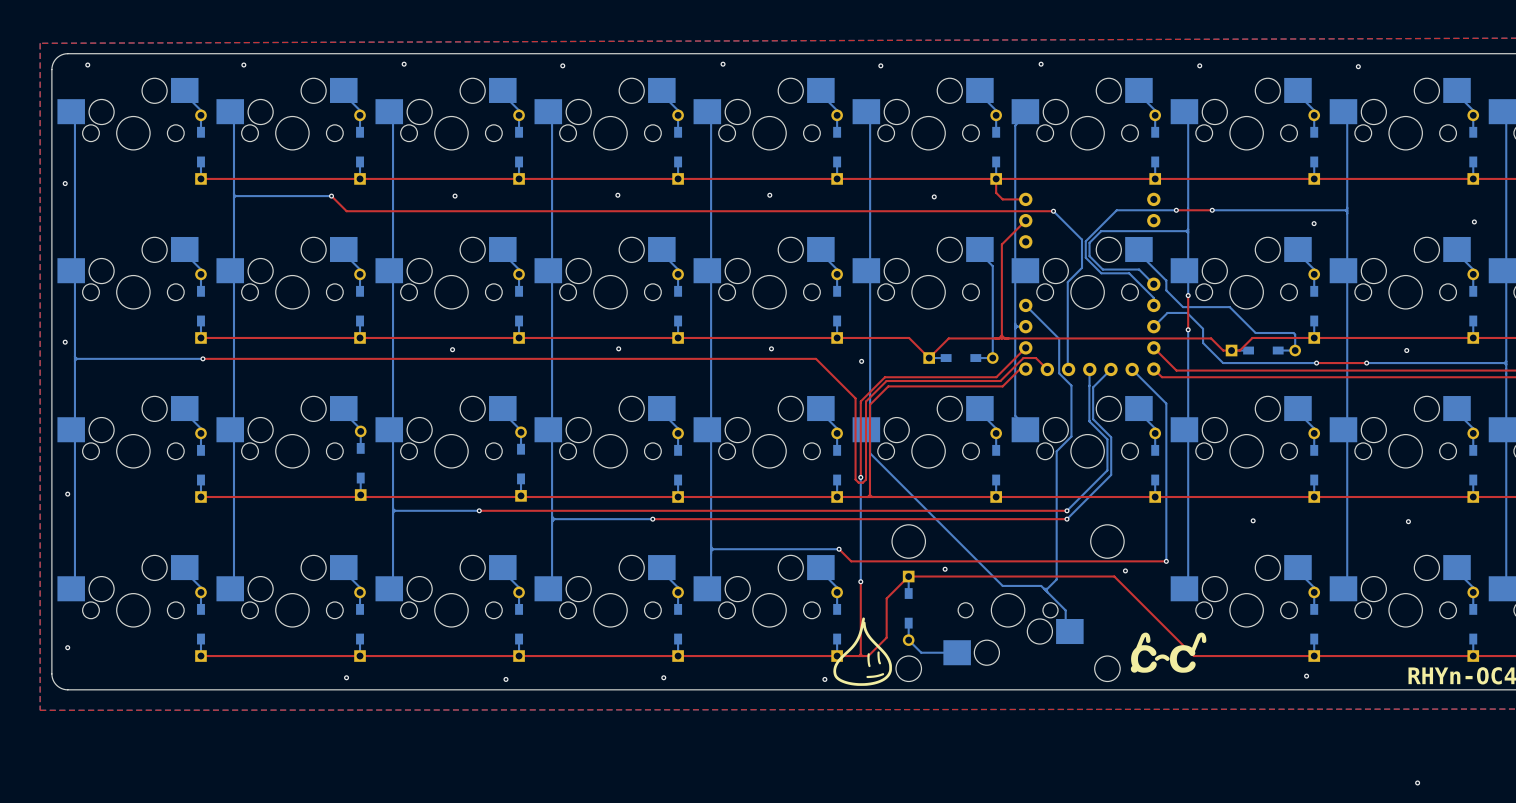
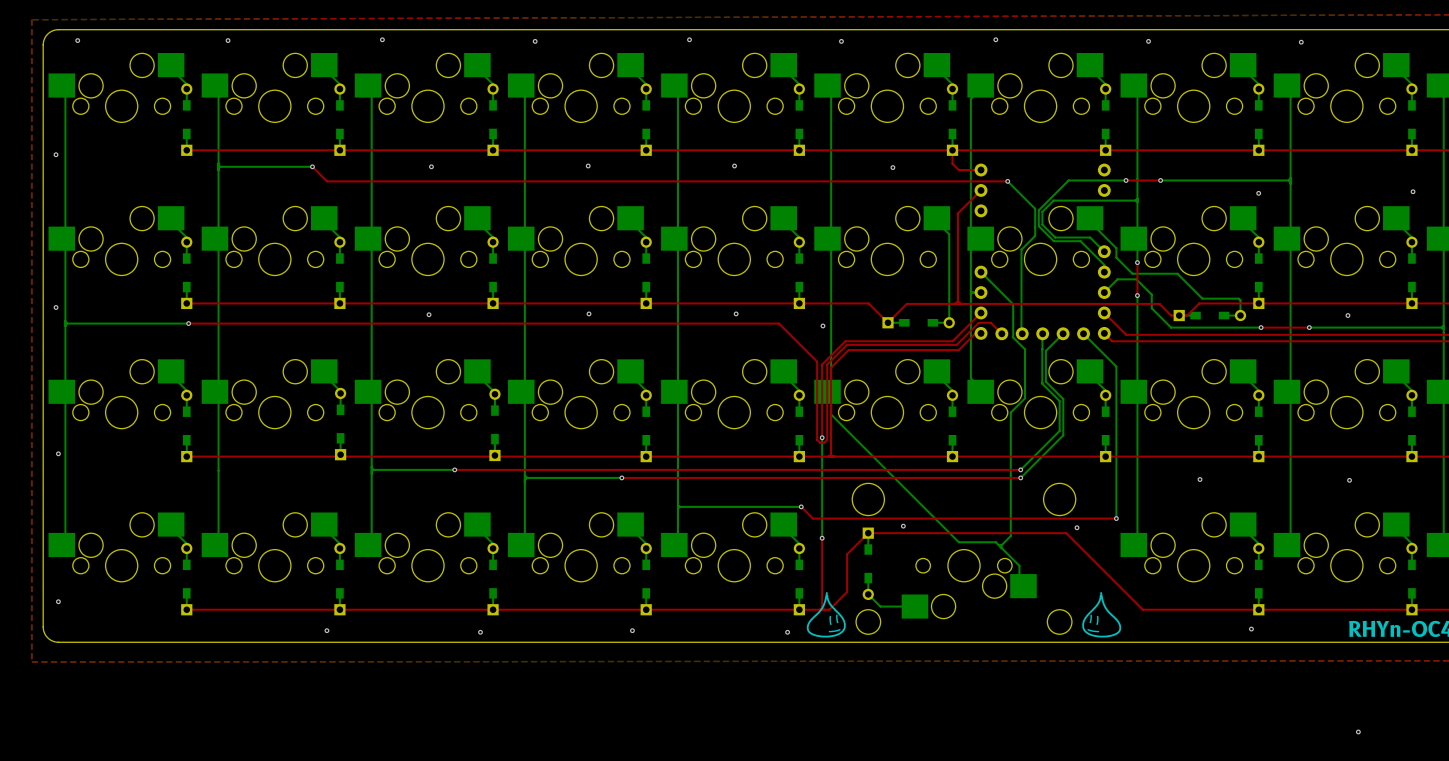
drawing: [833, 617, 892, 686] -> none
drawing: [1130, 632, 1207, 673] -> none
drawing: none -> [806, 592, 846, 638]
drawing: none -> [1082, 592, 1122, 638]

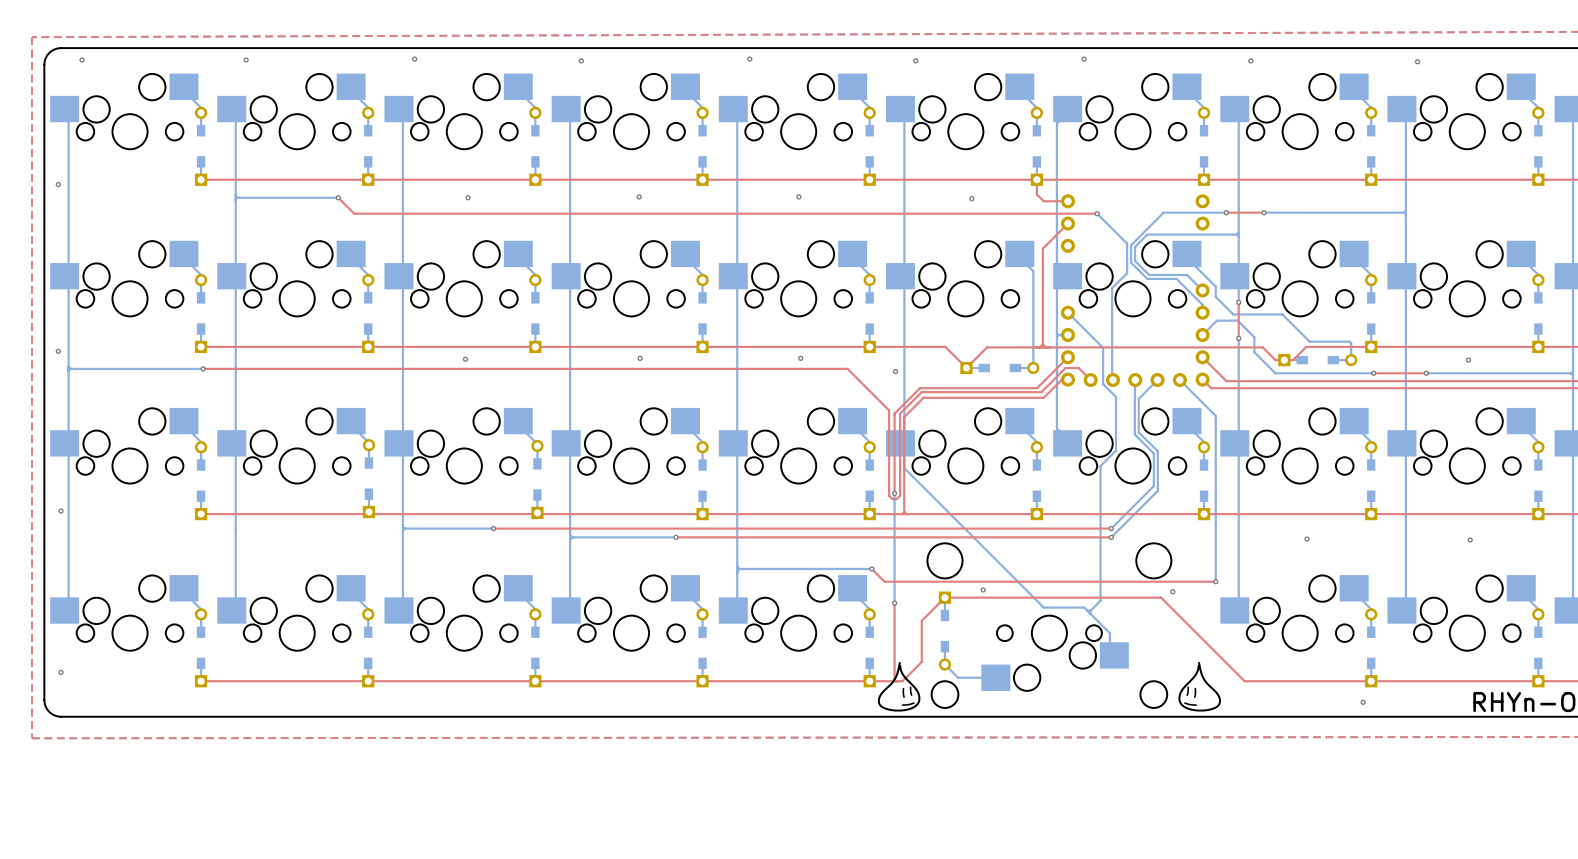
via: (1413, 191) -> none
via: (1258, 193) -> none
via: (326, 630) -> none
via: (632, 630) -> none
via: (480, 632) -> none
via: (787, 632) -> none
via: (1358, 731) -> none

